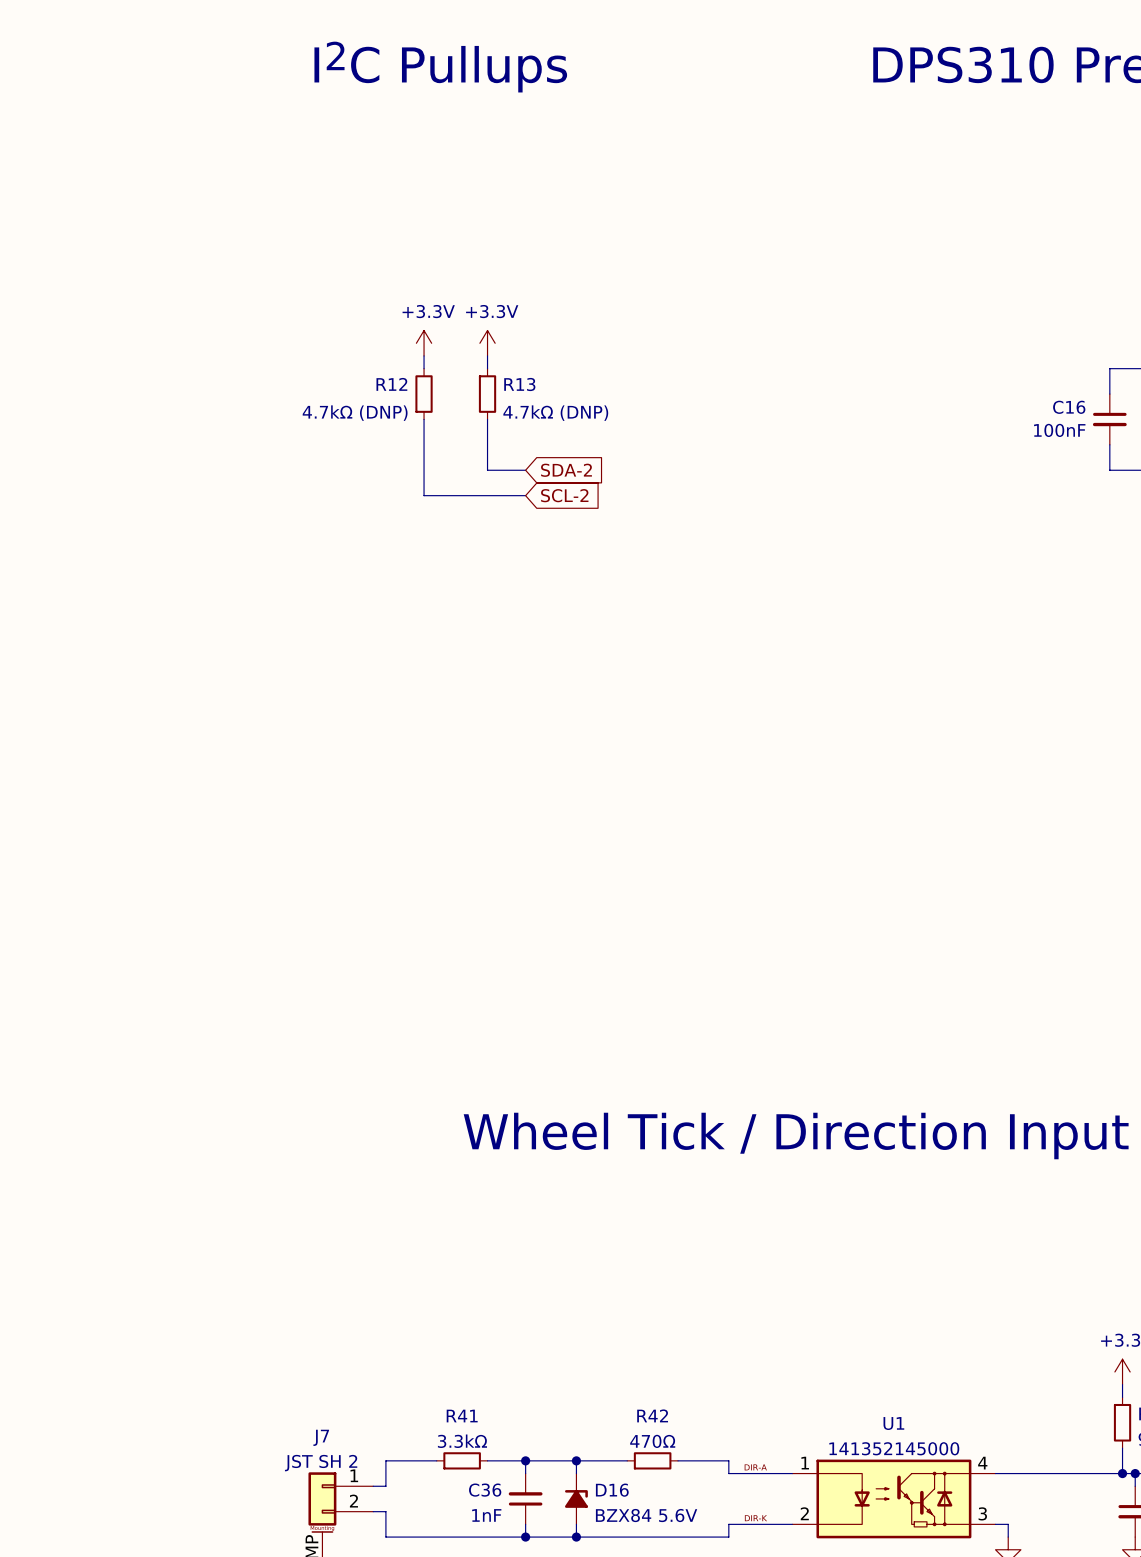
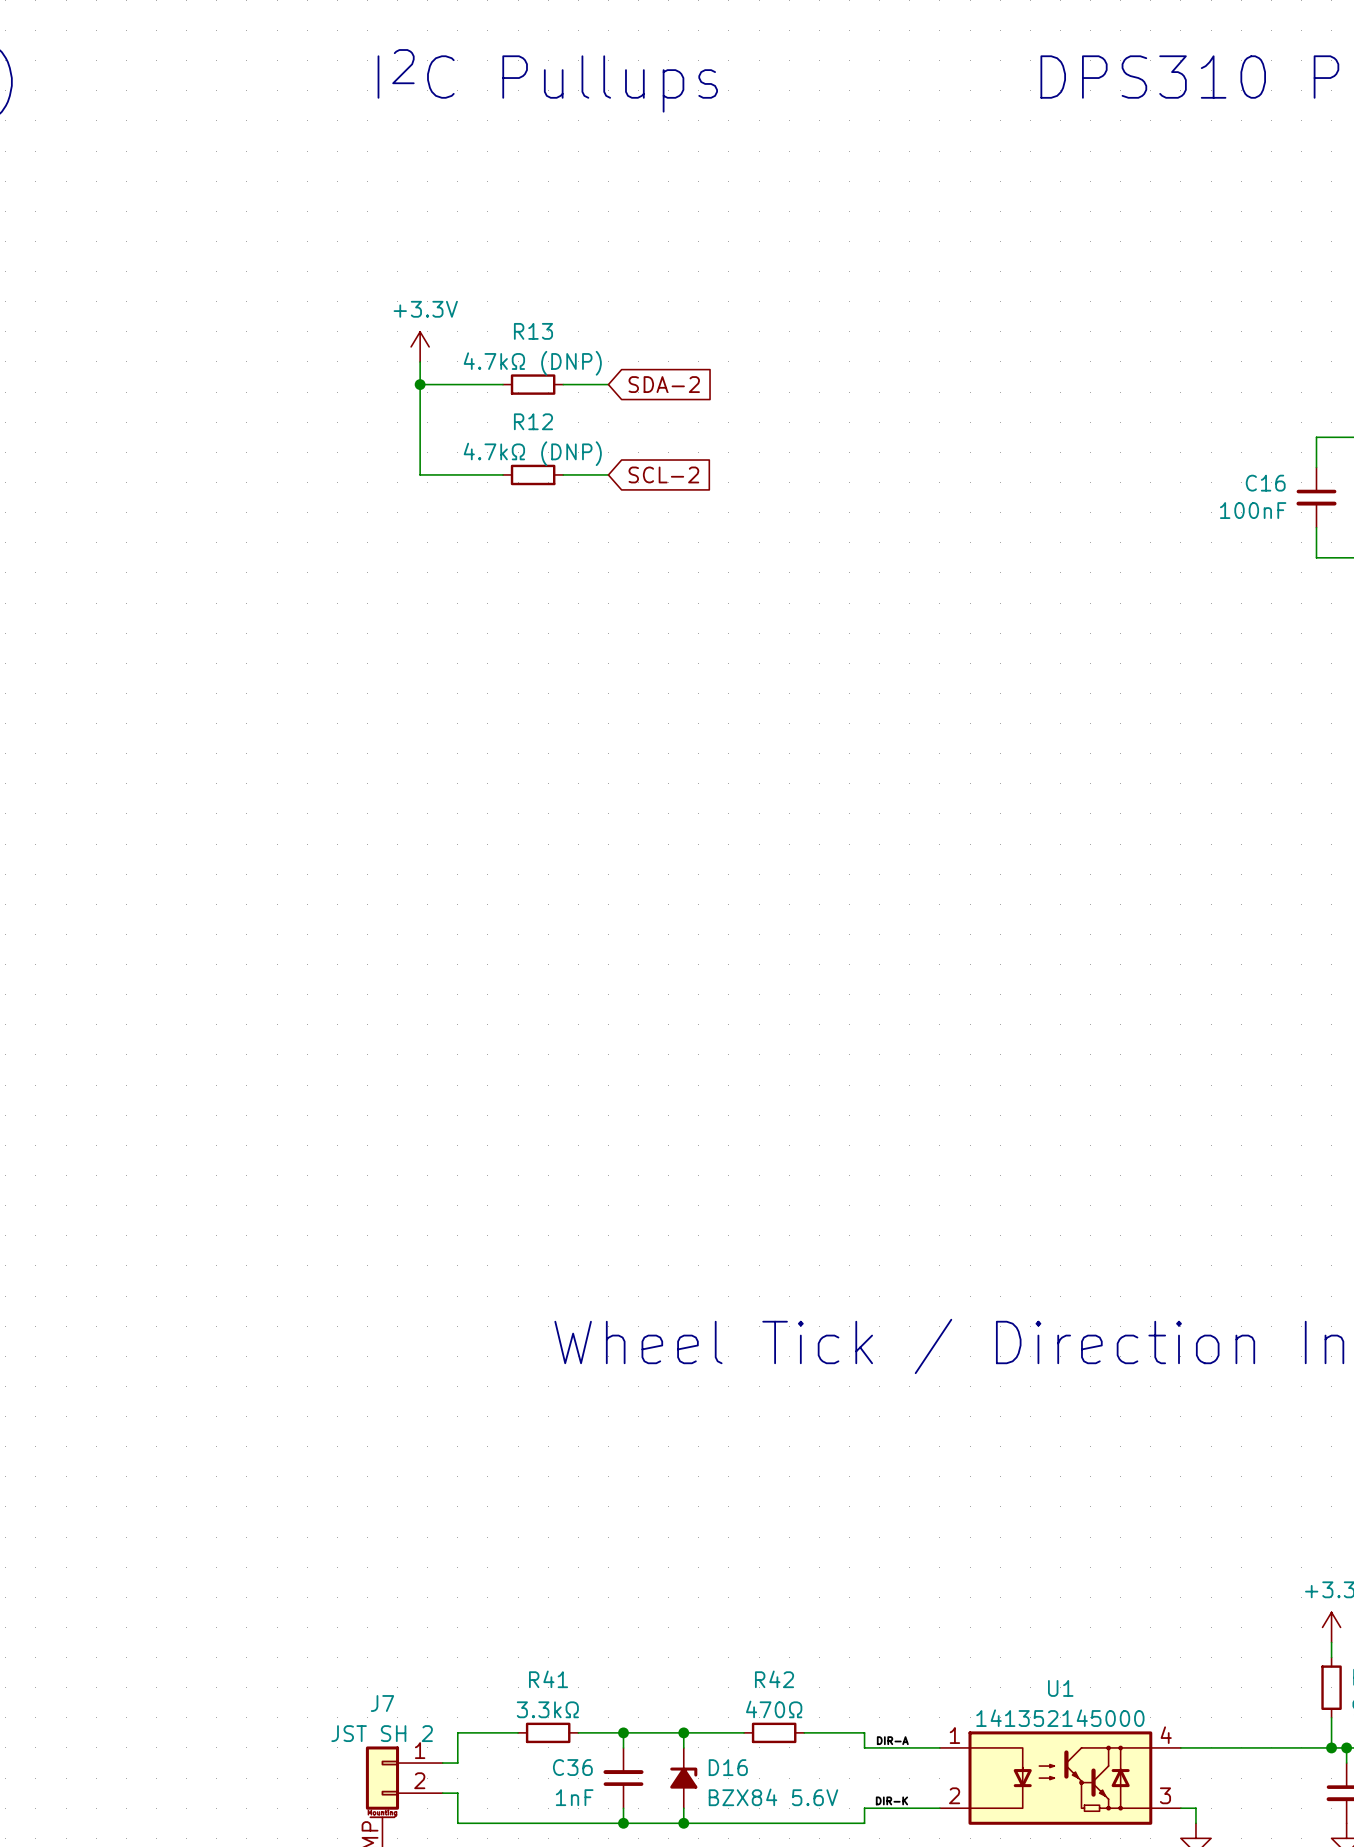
power symbol: none -> +3.3V (420, 346)
wire: none -> (420, 361) (420, 474) (502, 474)
wire: none -> (420, 384) (502, 384)
junction: none -> (420, 384)
wire: none -> (563, 384) (608, 384)
power symbol: +3.3V (424, 343) -> none
power symbol: +3.3V (487, 343) -> none
wire: (424, 355) (424, 368) -> none
wire: (487, 355) (487, 368) -> none
R13 name position: R13 (519, 384) -> R13 (533, 331)
R12 rotation: 0° (424, 394) -> 90° clockwise (533, 474)
R13 rotation: 0° (487, 394) -> 90° clockwise (533, 384)
R13 position: (487, 394) -> (533, 384)
wire: none -> (563, 474) (608, 474)
R12 value position: 4.7kΩ (DNP) (355, 413) -> 4.7kΩ (DNP) (532, 453)
R13 value position: 4.7kΩ (DNP) (555, 413) -> 4.7kΩ (DNP) (532, 363)
wire: (424, 419) (424, 495) (525, 495) -> none
wire: (487, 419) (487, 470) (525, 470) -> none
global label position: SDA-2 (566, 470) -> SDA-2 (664, 384)
global label position: SCL-2 (564, 495) -> SCL-2 (663, 474)

